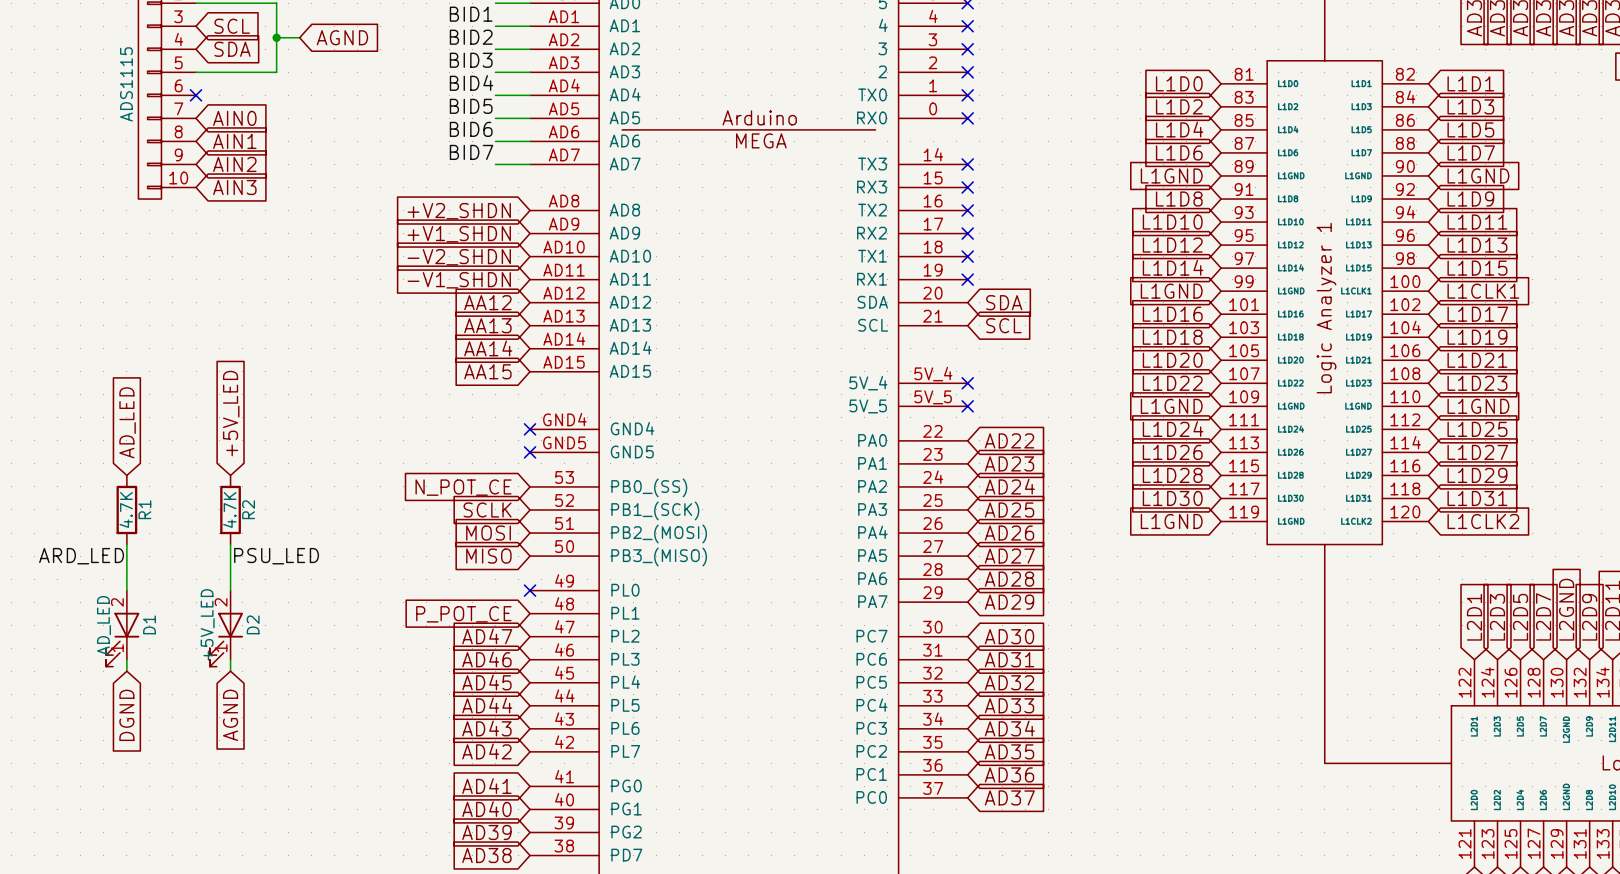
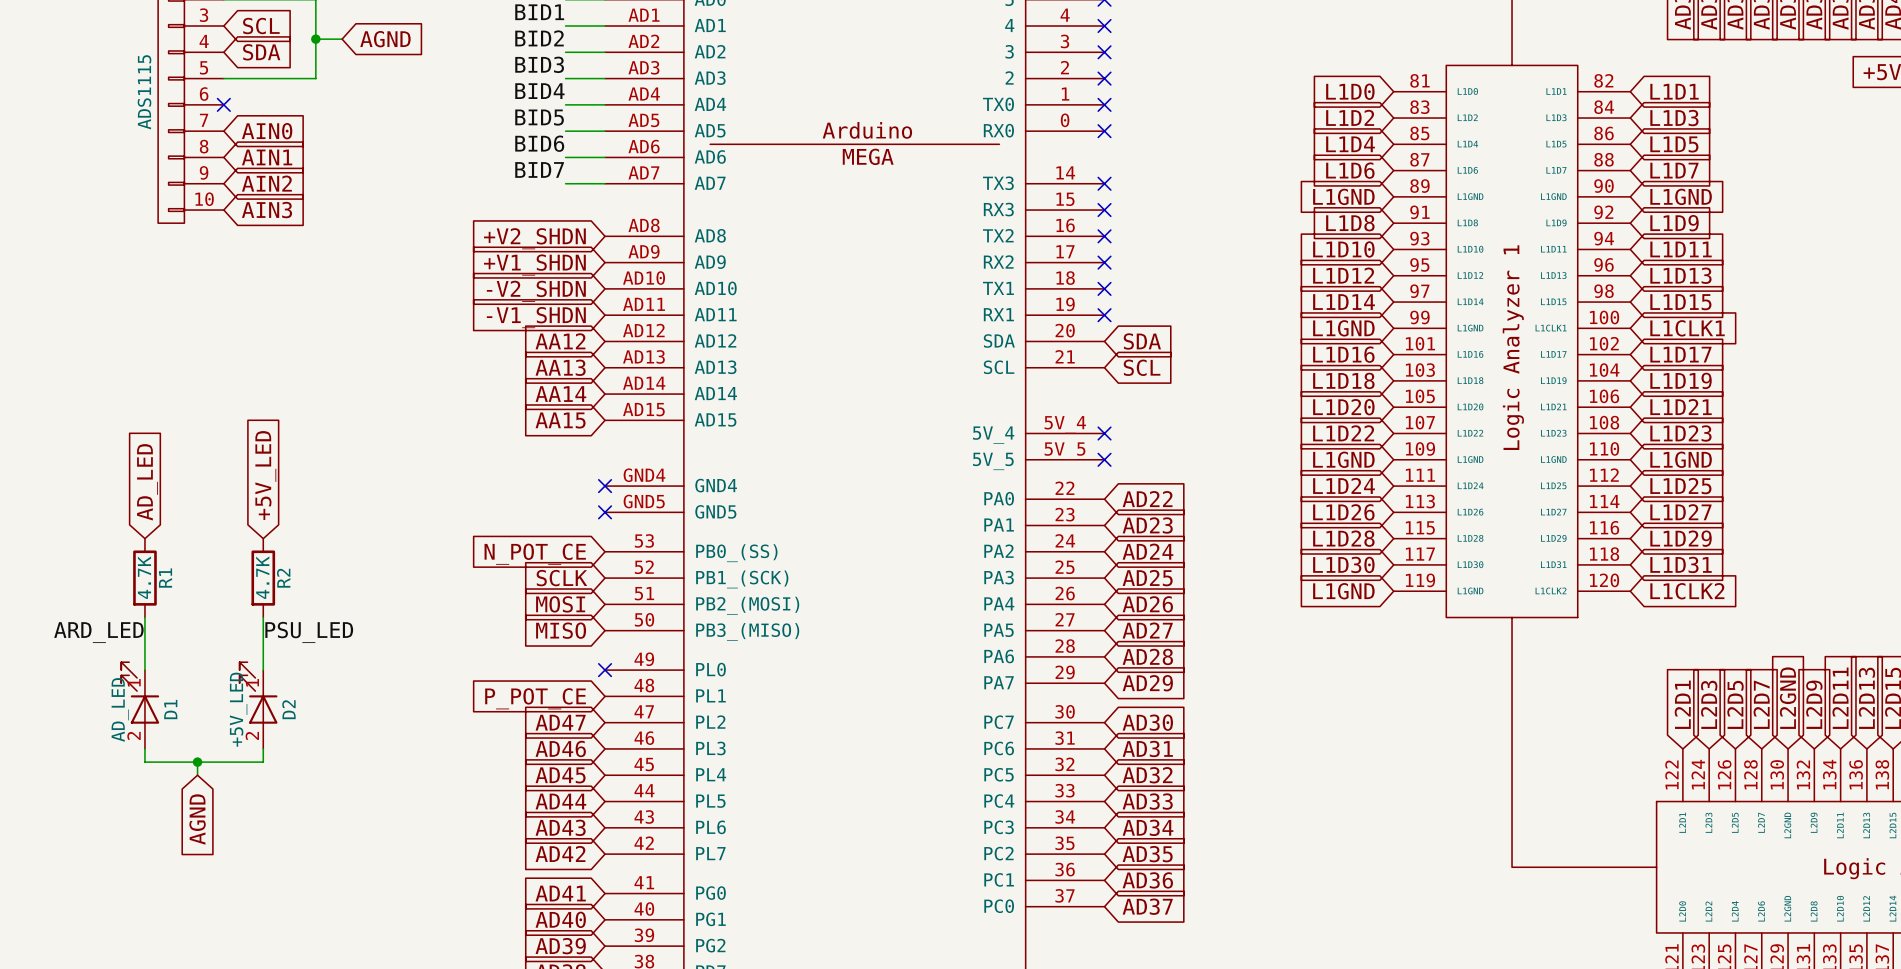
D1 flip: as is (122, 639) -> up-down (140, 692)
D2 flip: as is (226, 639) -> up-down (258, 692)
wire: none -> (144, 762) (263, 762)
wire: none -> (197, 762) (197, 775)
junction: none -> (197, 762)
global label: DGND (126, 715) -> none
global label position: AGND (230, 715) -> AGND (197, 819)

